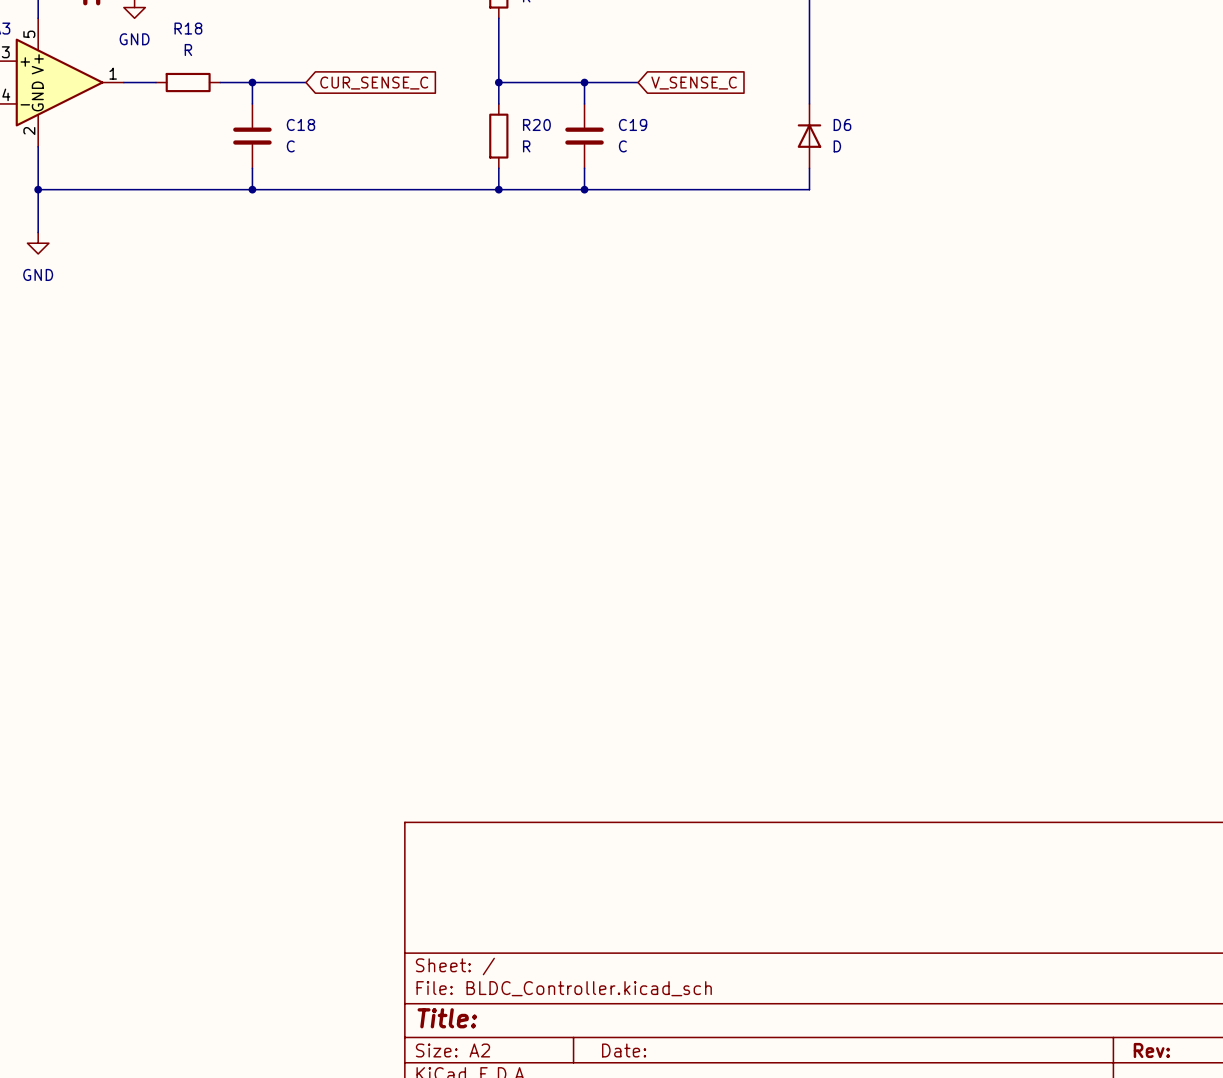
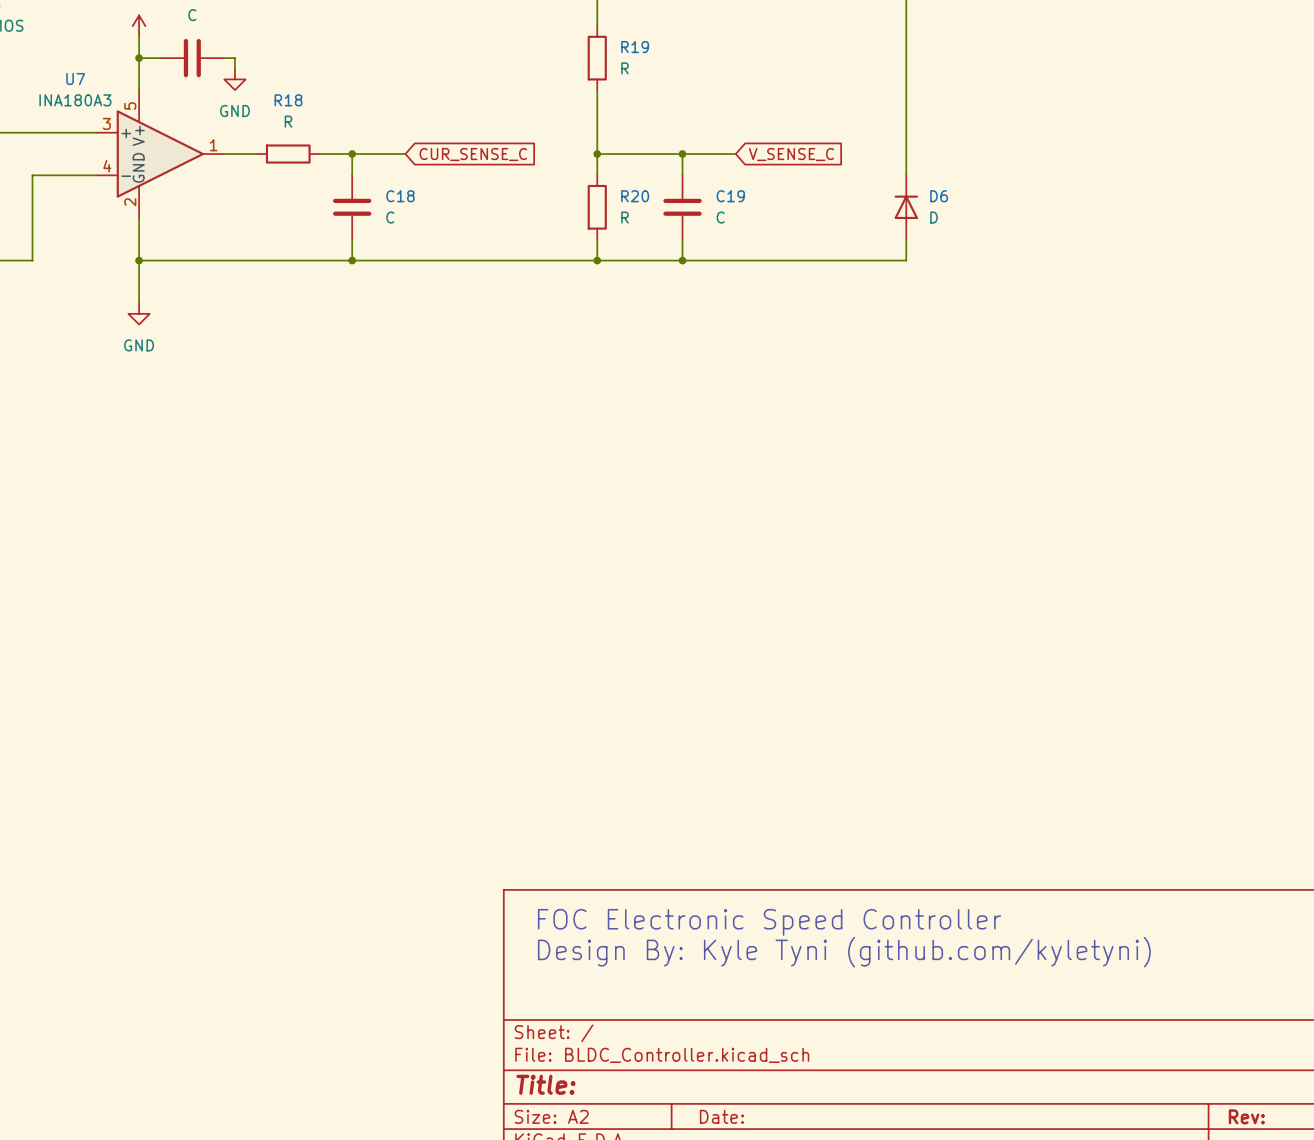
text: none -> FOC Electronic Speed Controller (769, 922)
text: none -> Design By: Kyle Tyni (github.com/kyletyni) (844, 952)

